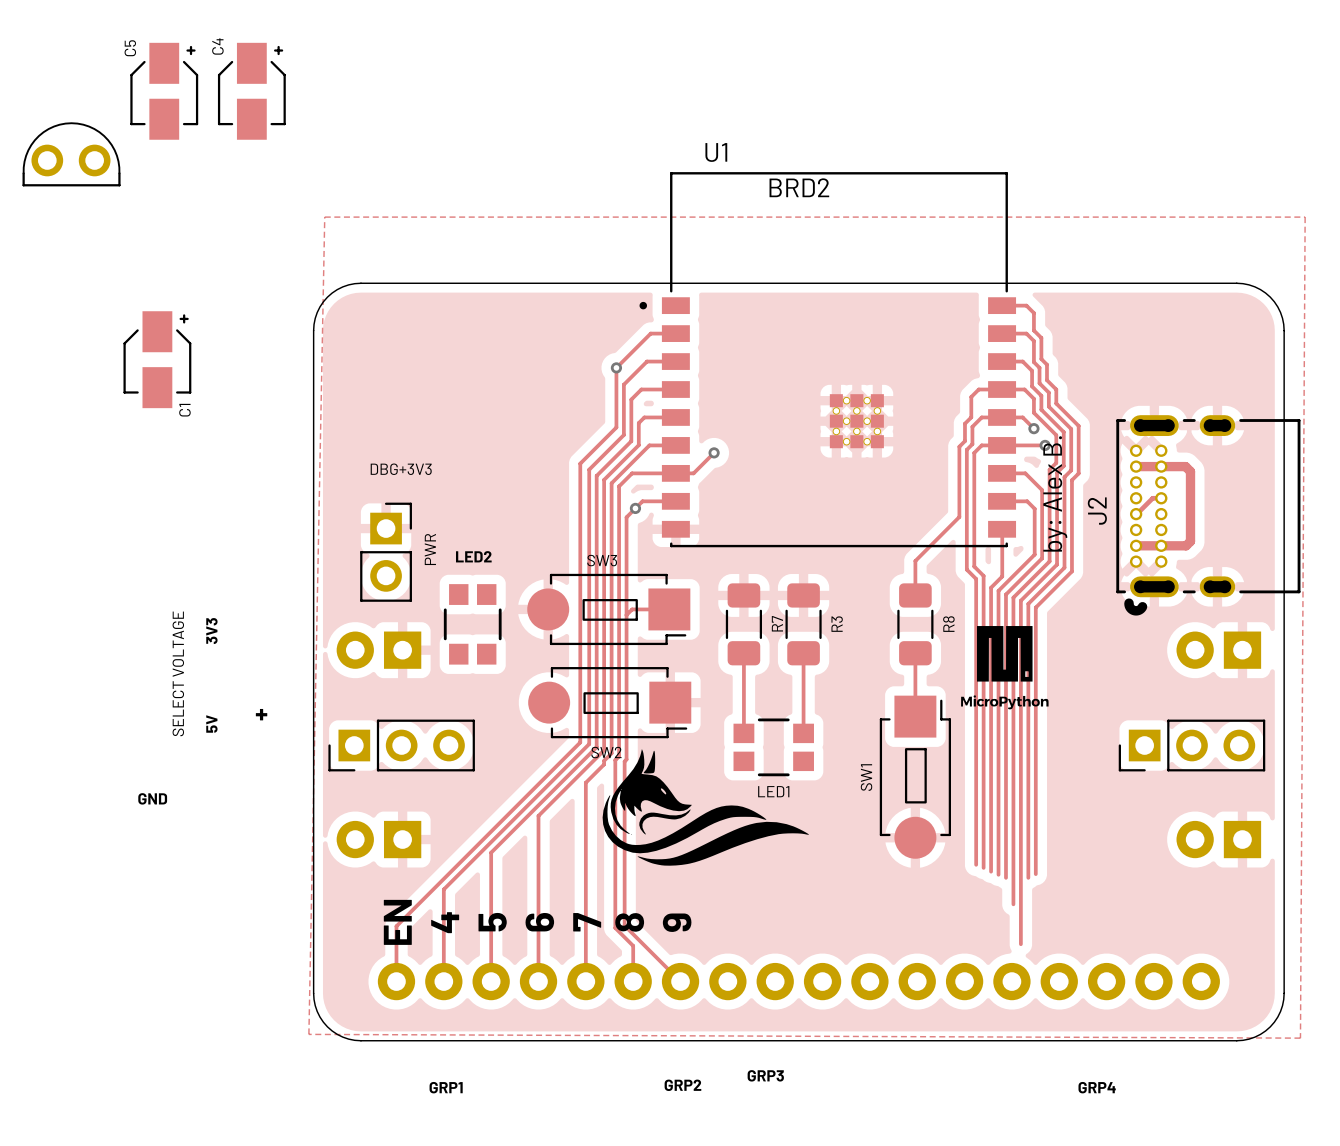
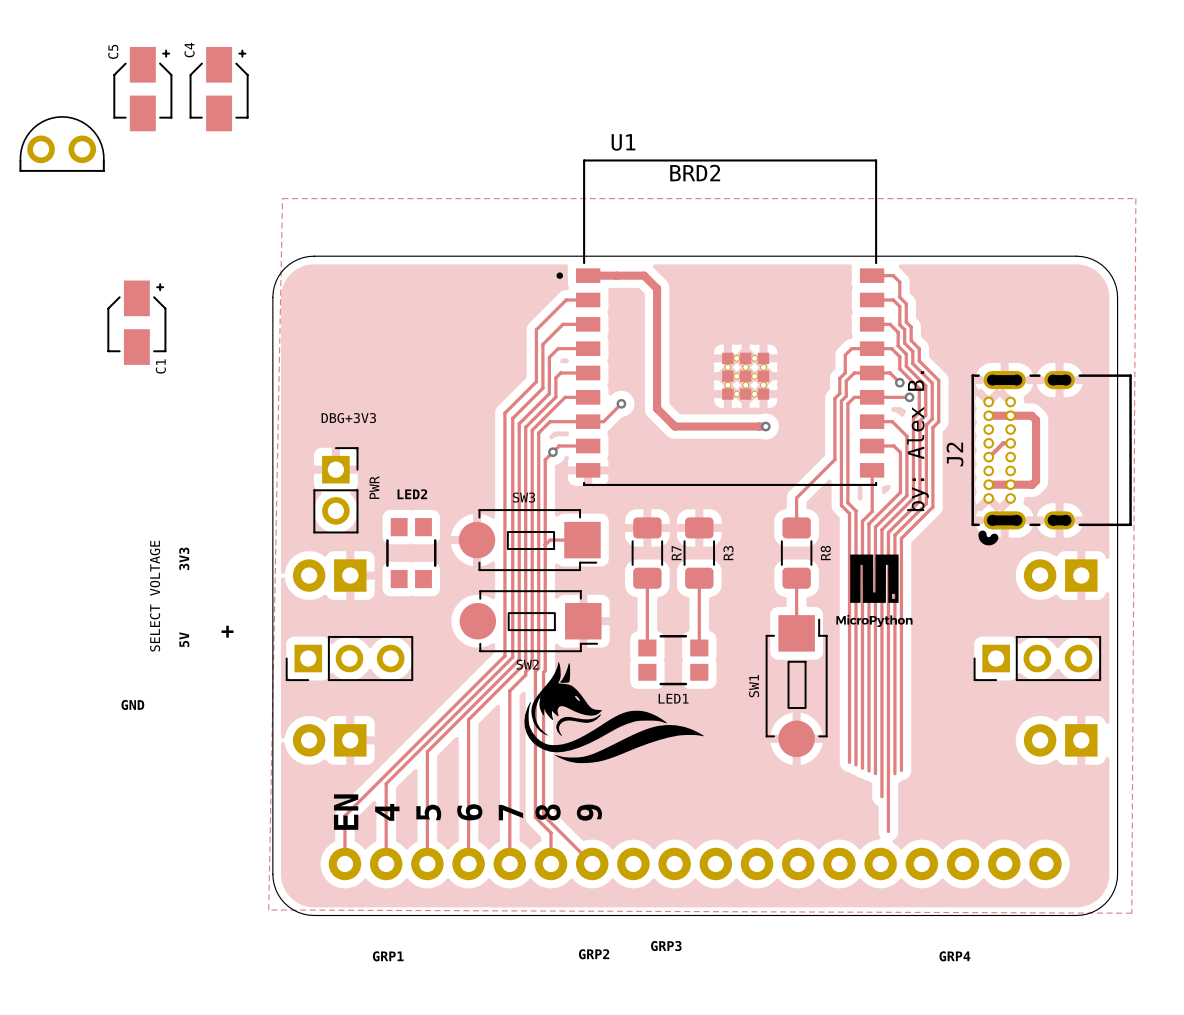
track: none -> (588, 275) (644, 275) (657, 288) (657, 408) (674, 426) (765, 426)
via: (616, 367) -> none
via: none -> (765, 426)

